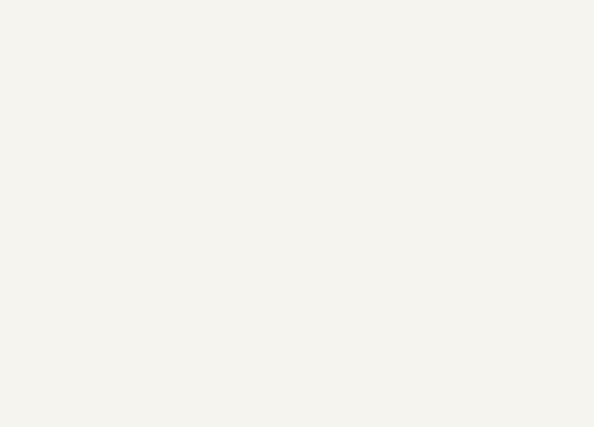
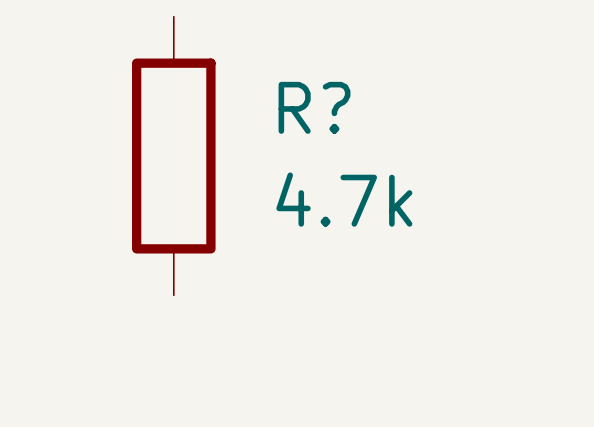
R?: none -> 4.7k (173, 156)

